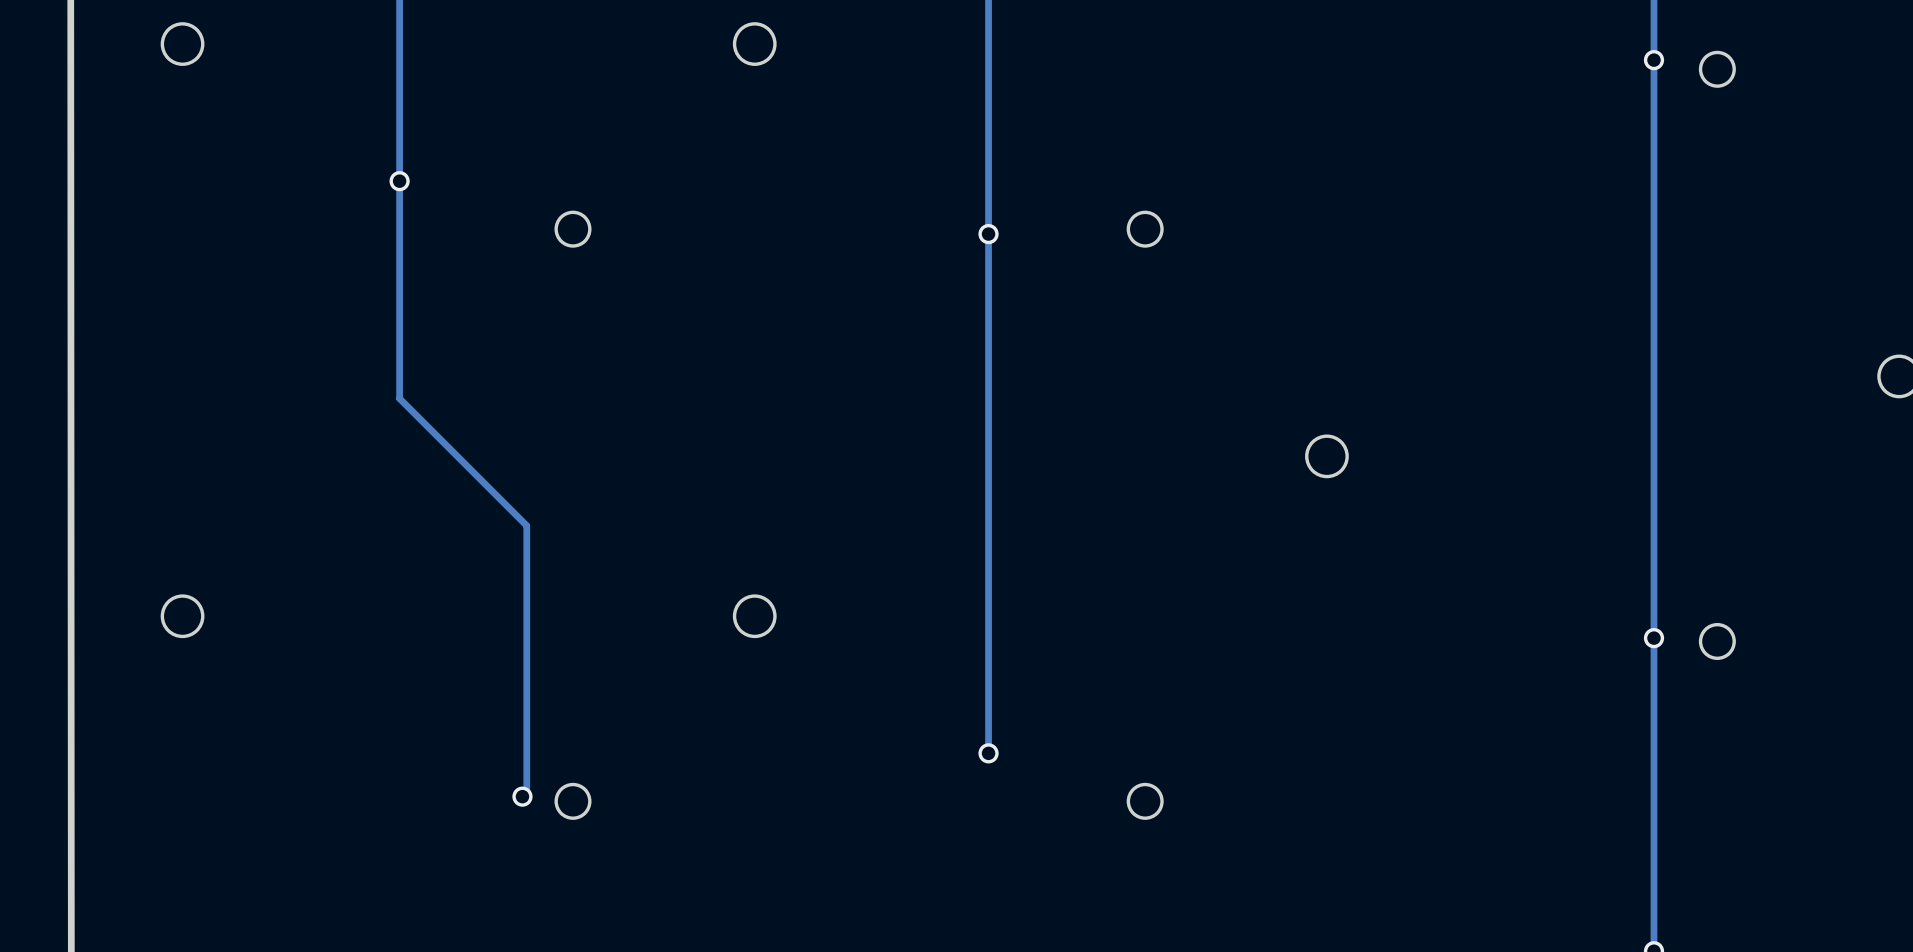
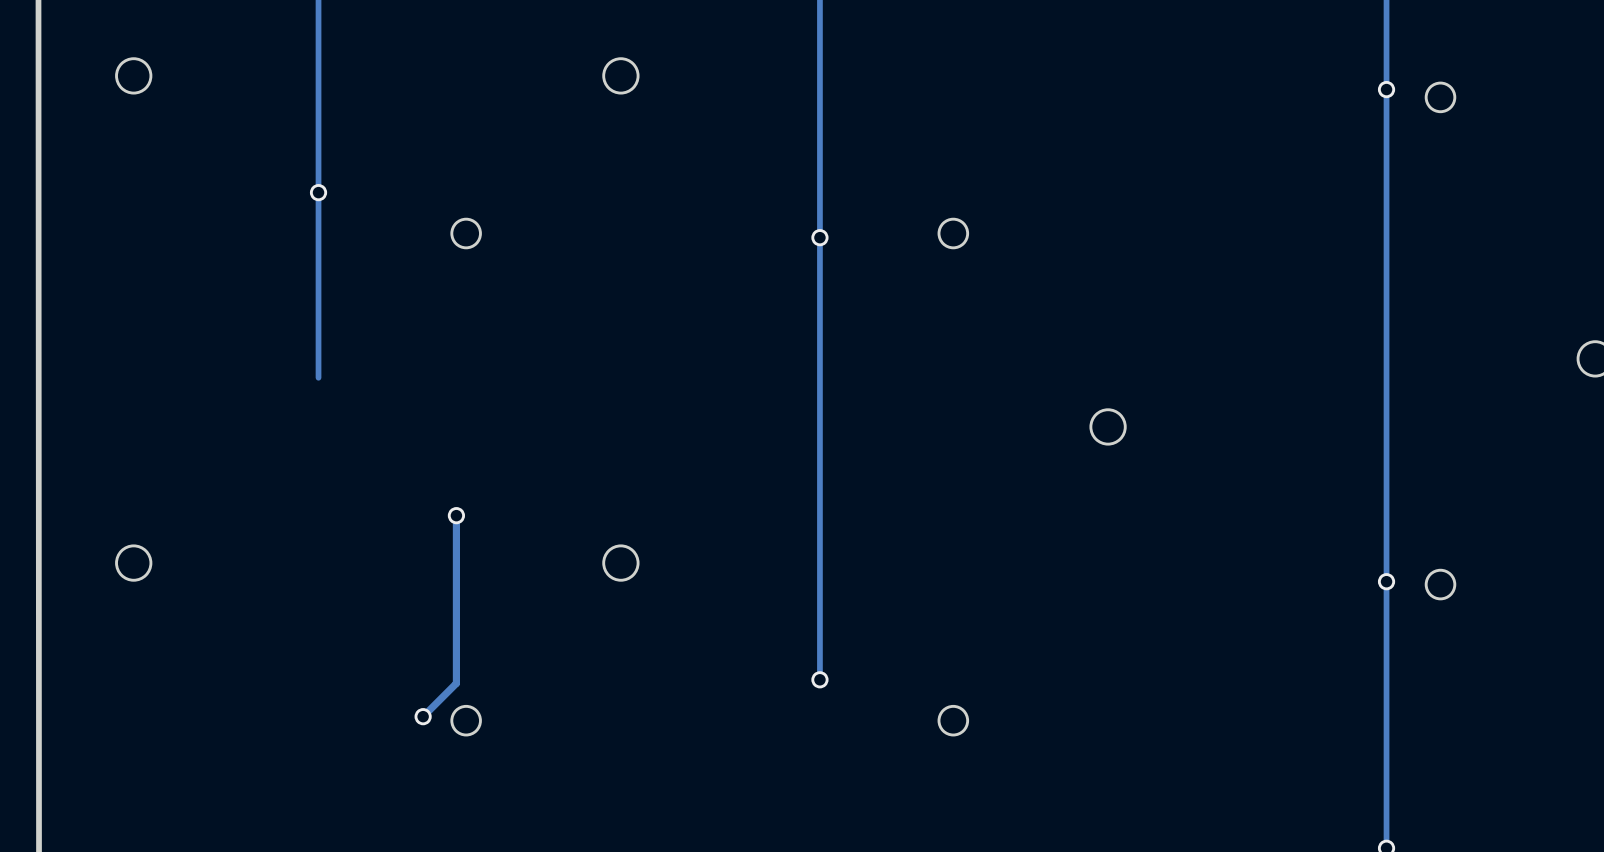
track: (399, 398) (526, 525) (526, 792) -> (456, 515) (456, 683) (426, 712)
via: none -> (456, 515)

